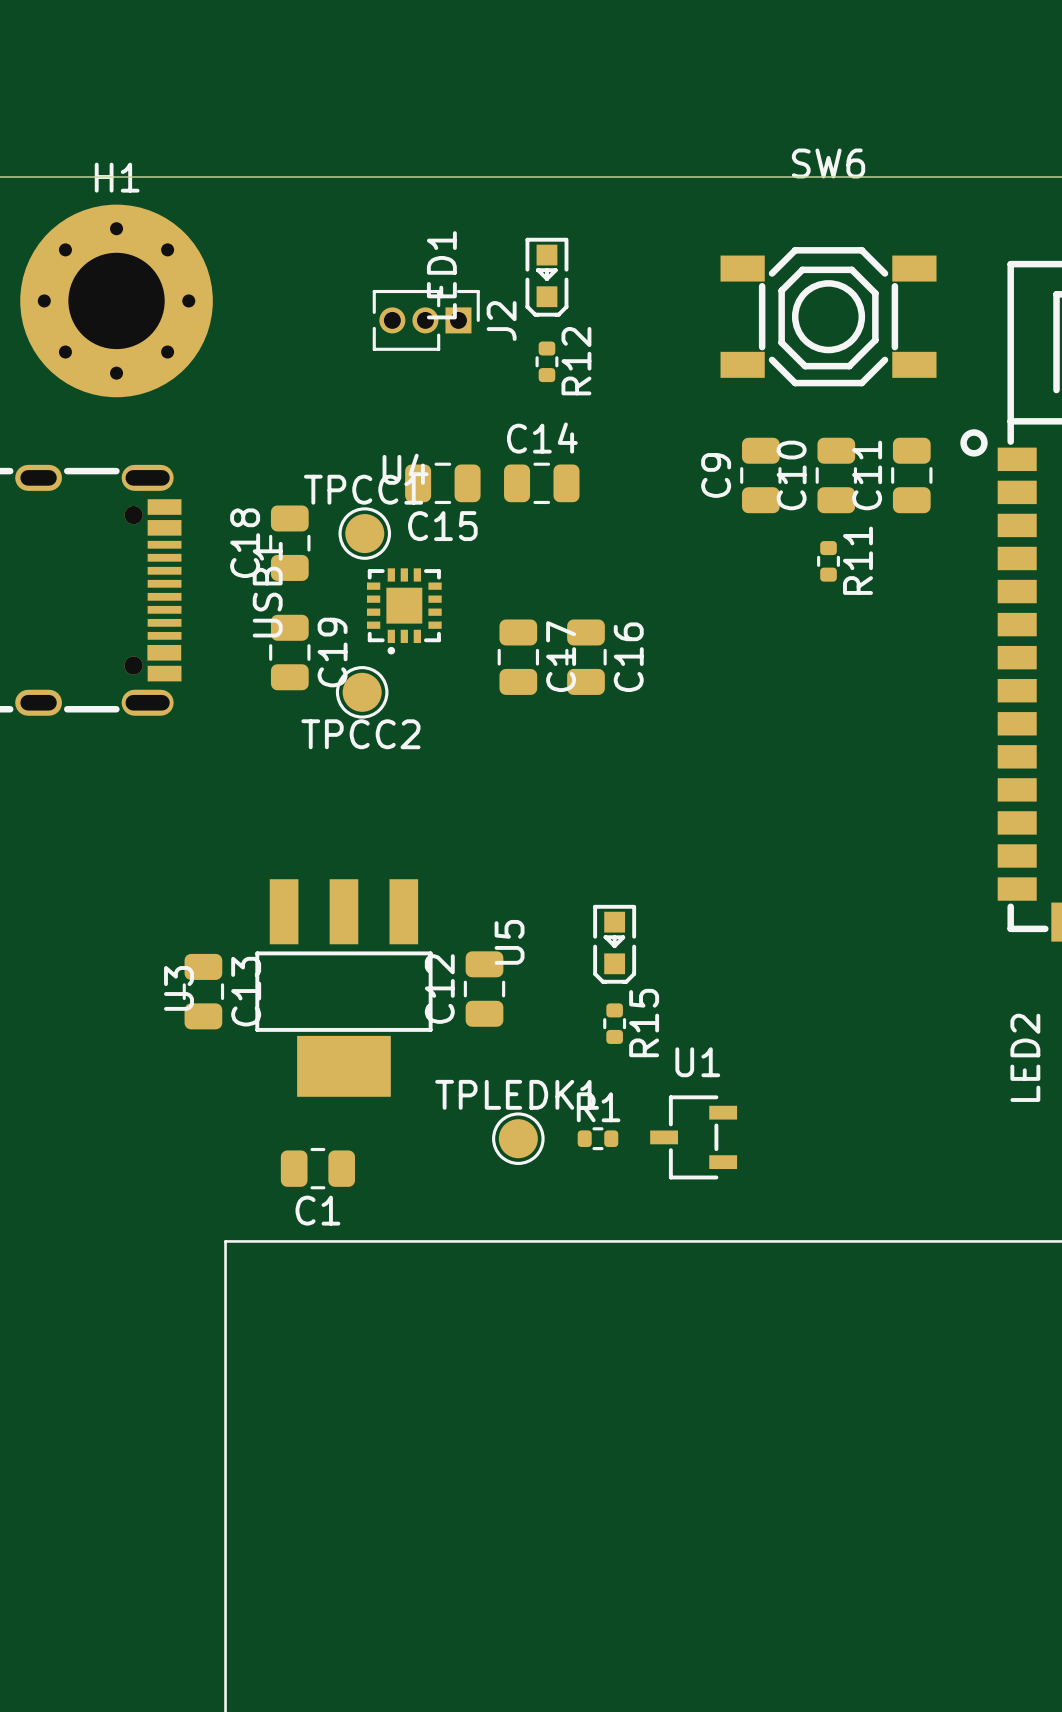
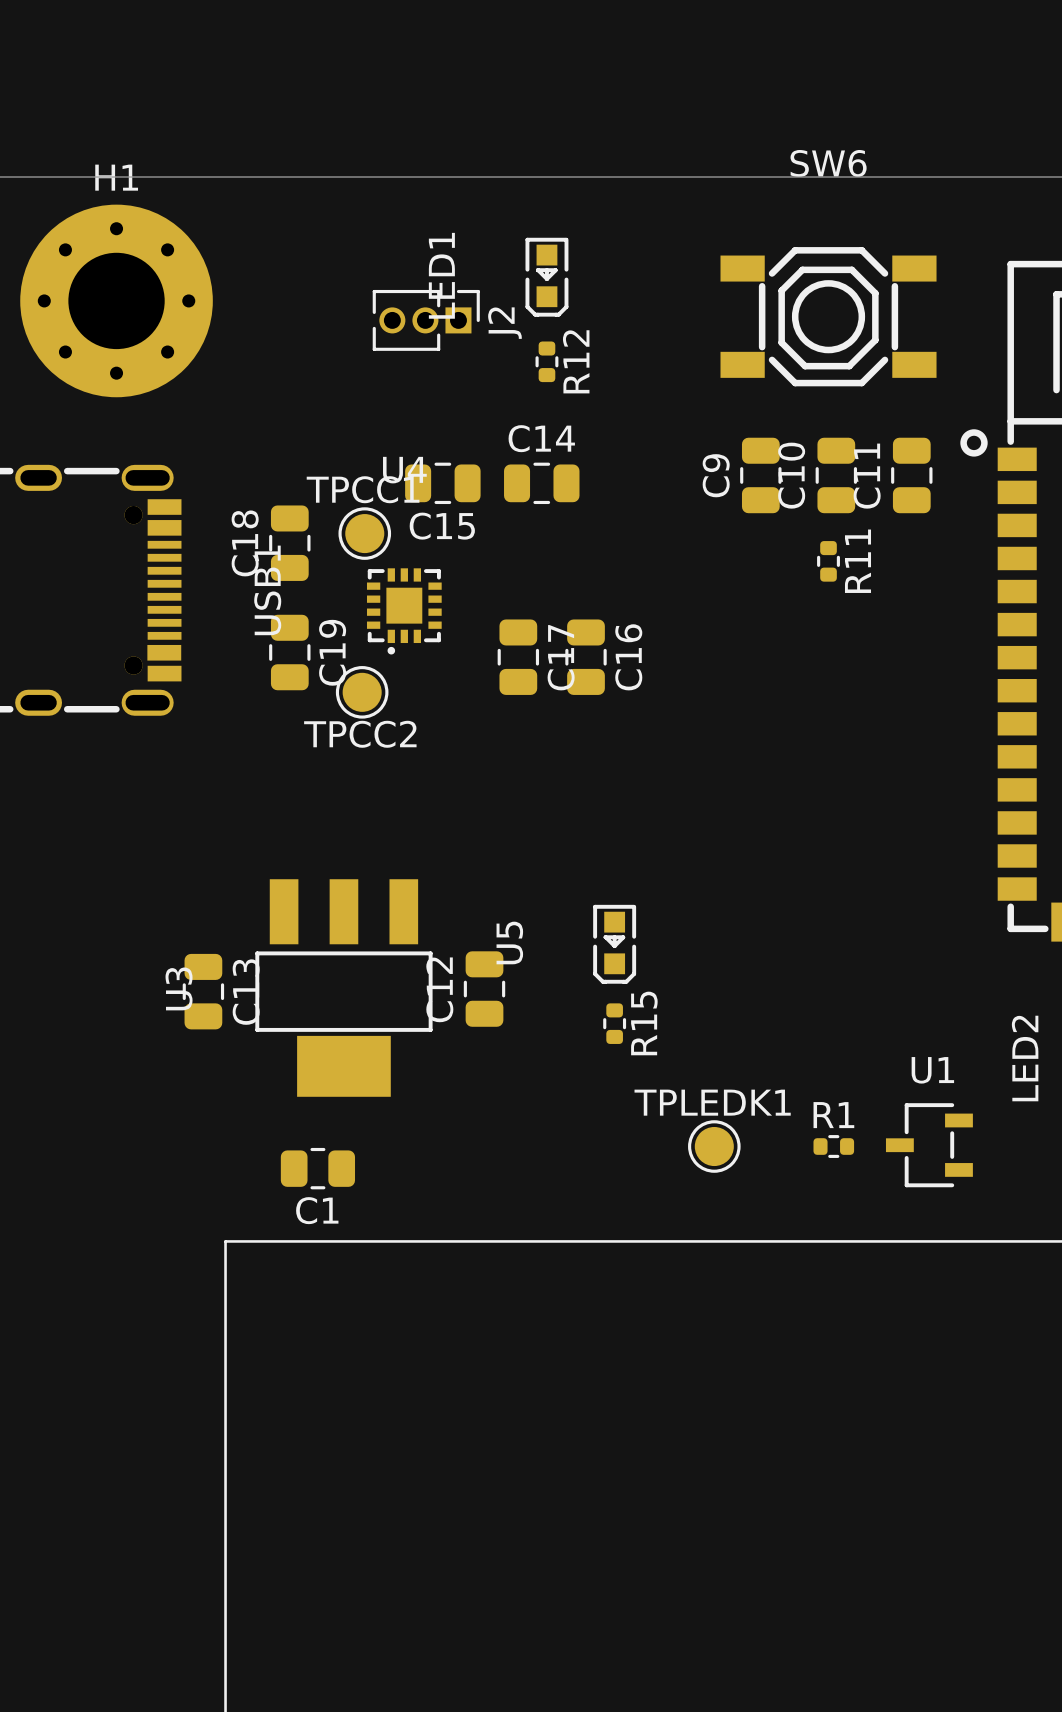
U1 position: (693, 1137) -> (929, 1145)
TPLEDK1 position: (518, 1138) -> (714, 1146)
R1 position: (597, 1138) -> (833, 1146)

